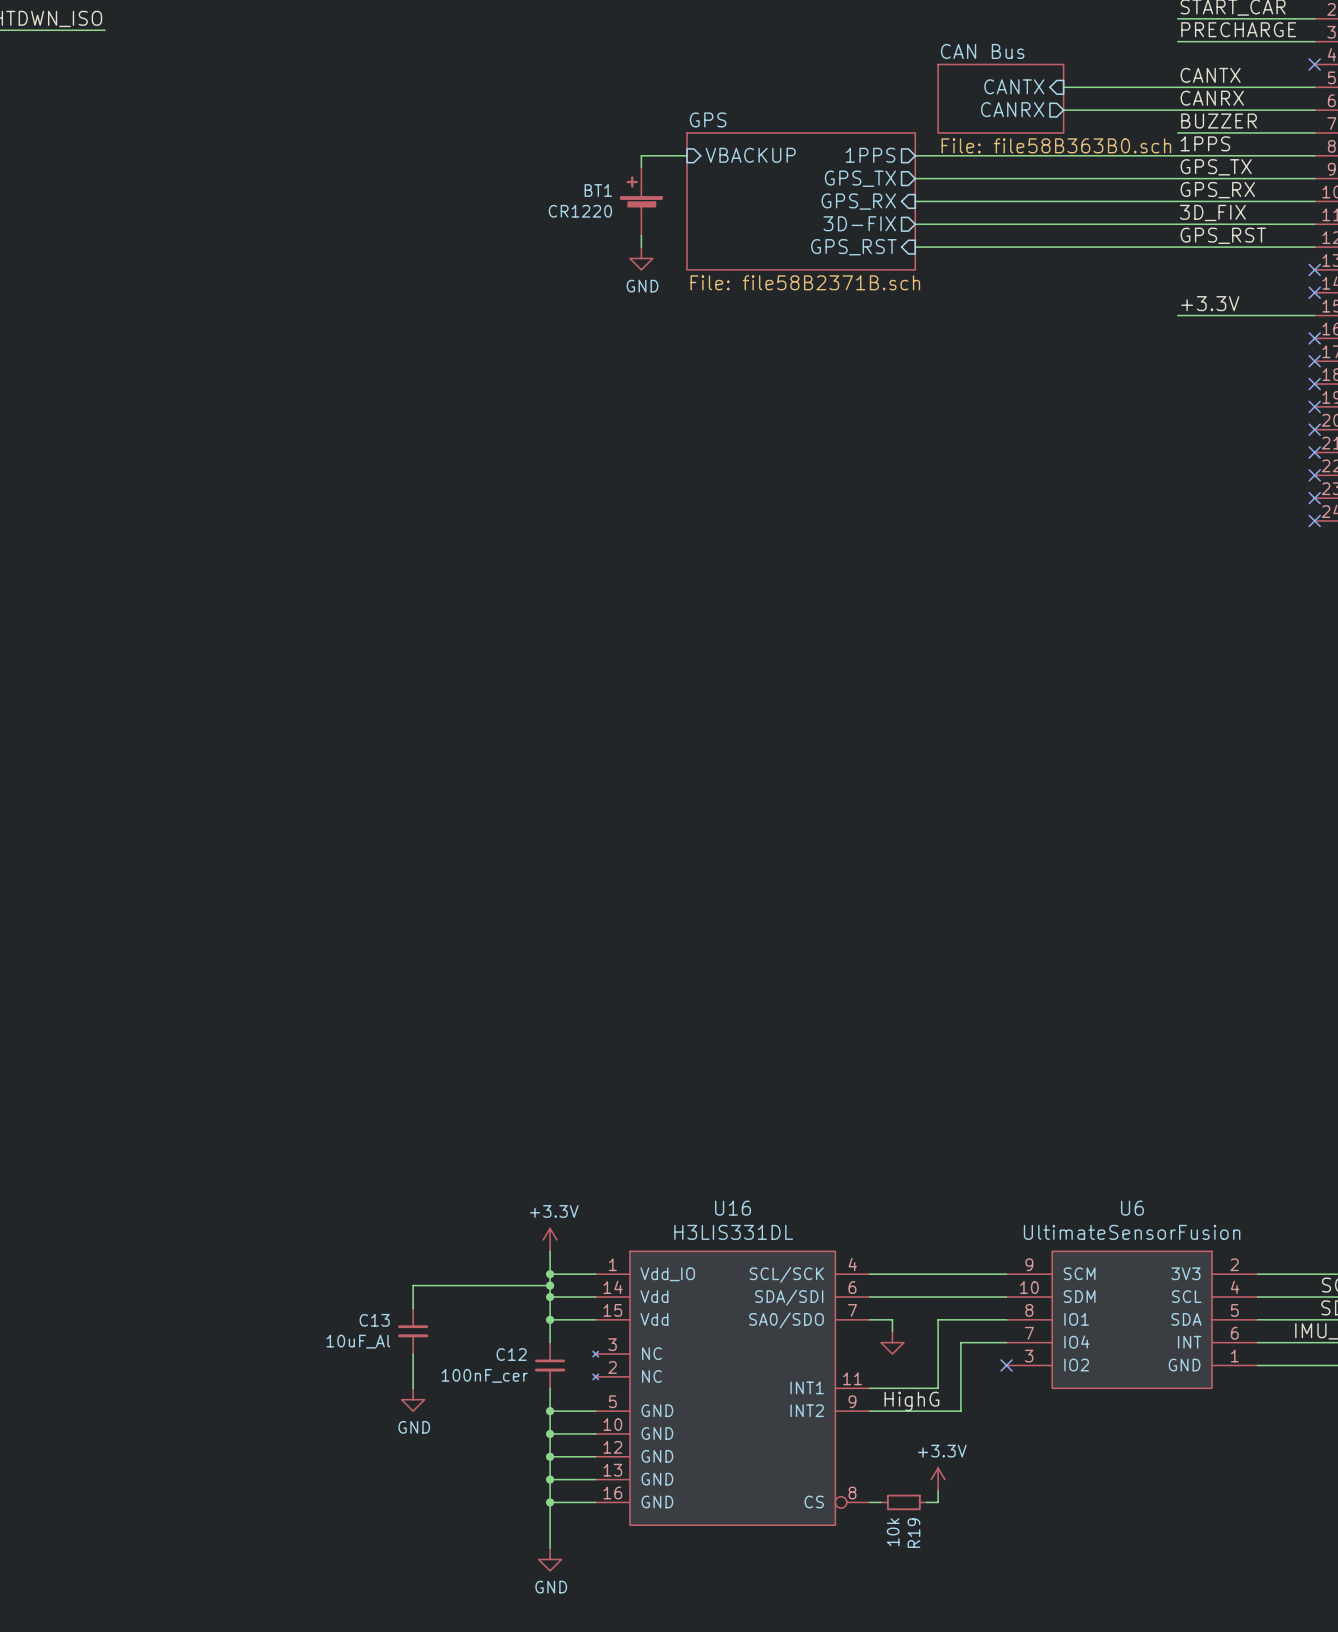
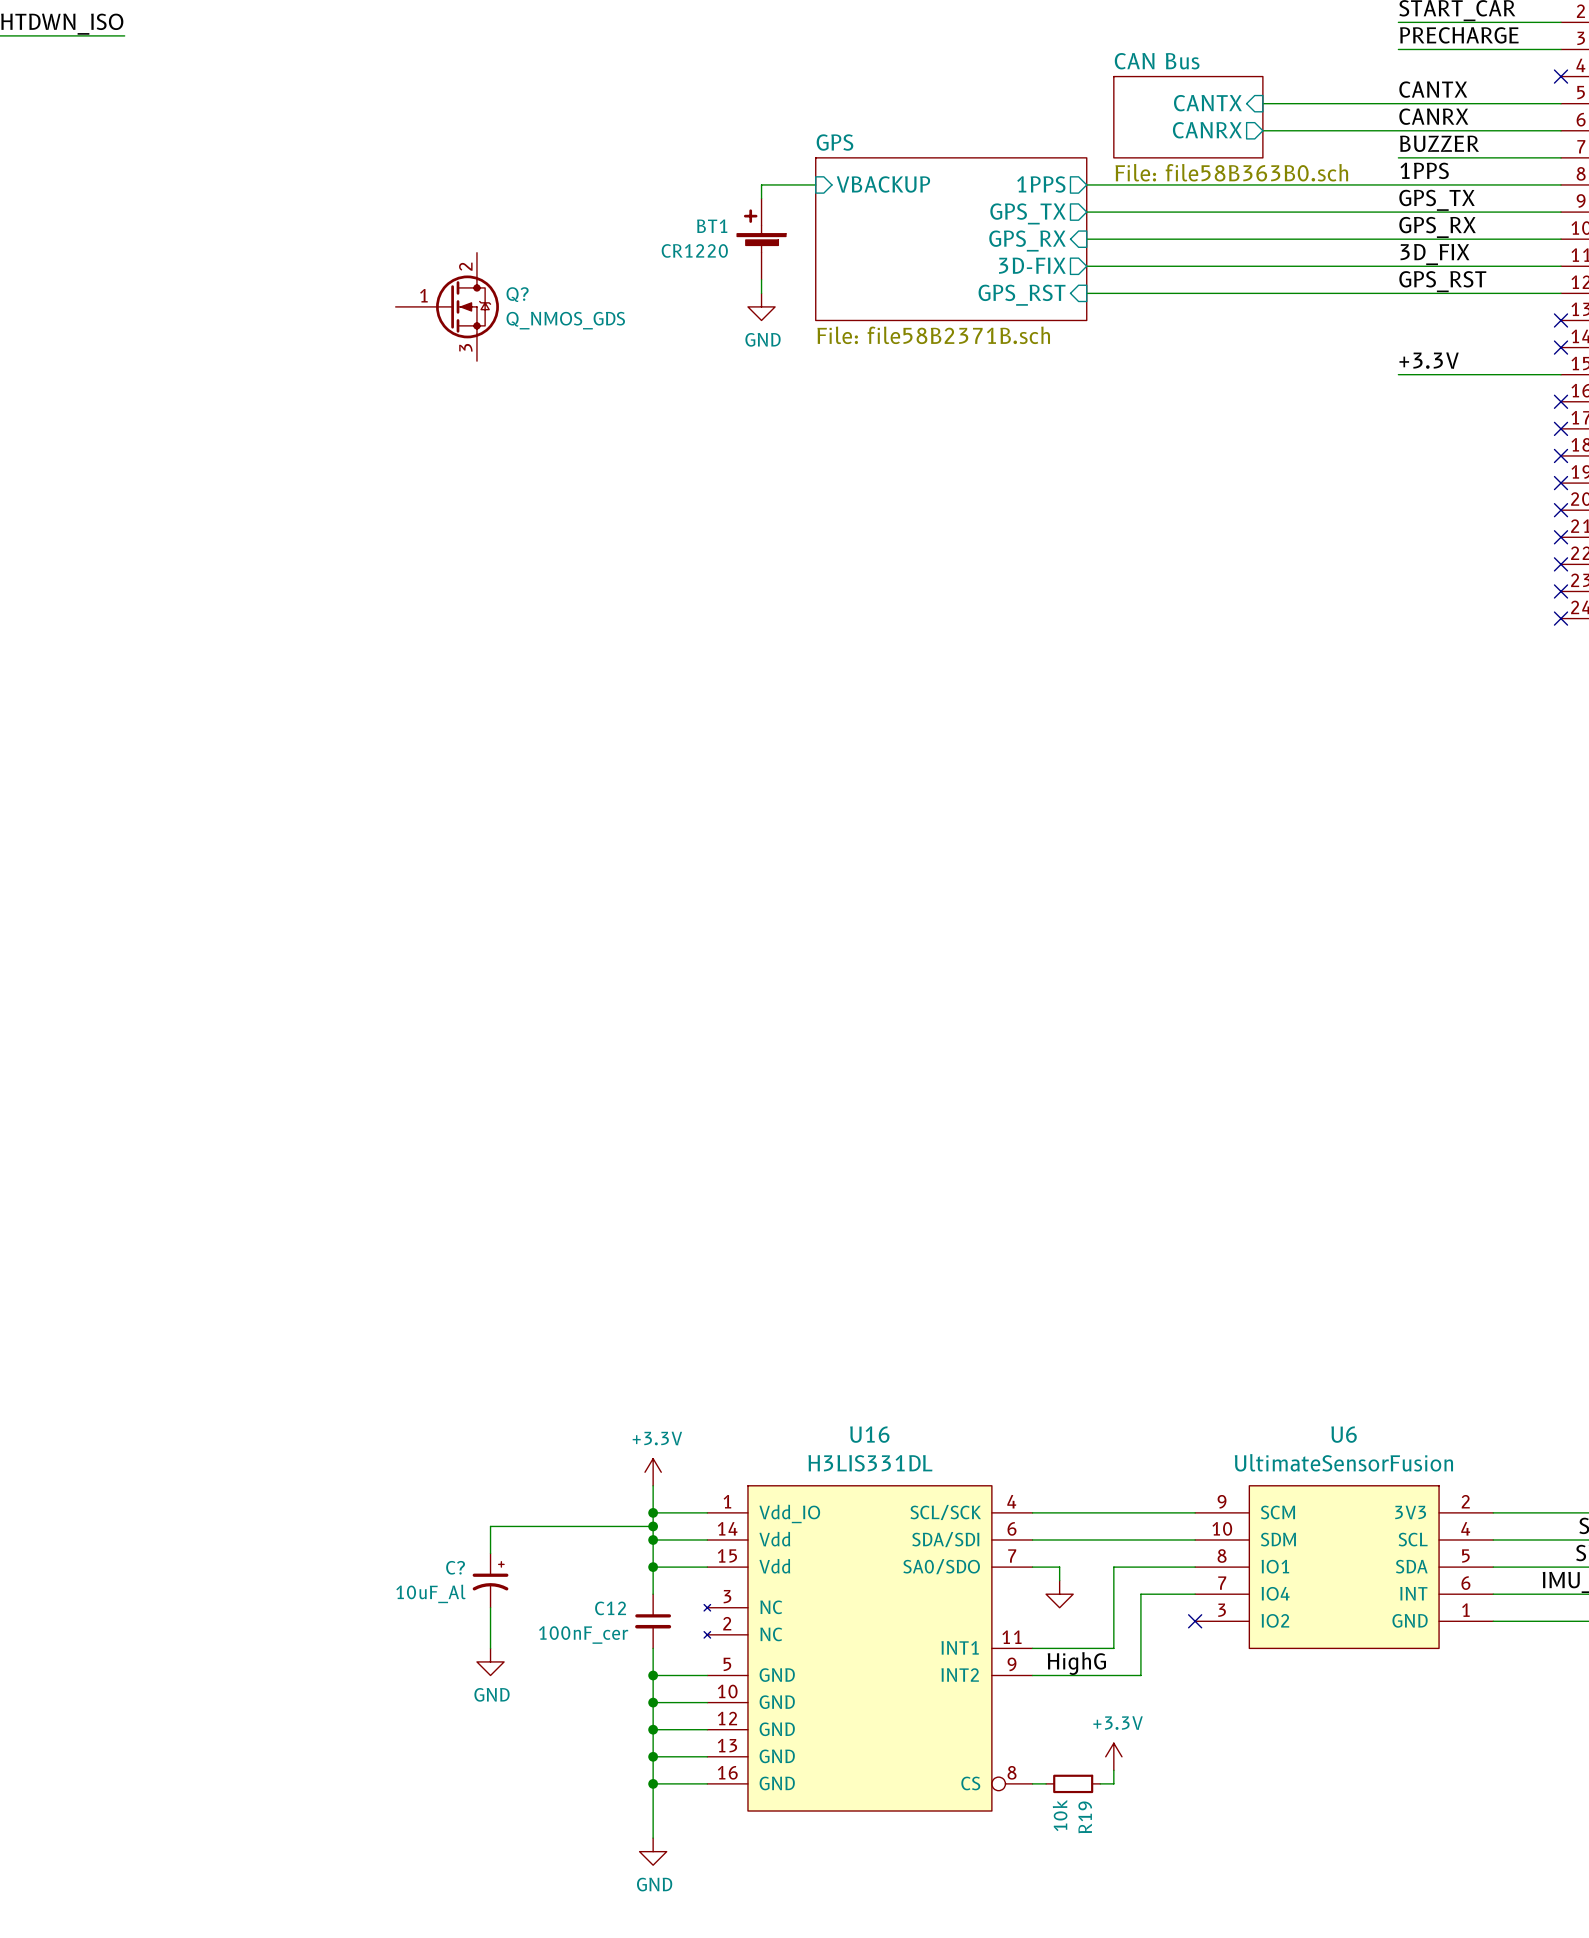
Q?: none -> Q_NMOS_GDS (447, 306)
C13: 10uF_Al (413, 1331) -> none
C?: none -> 10uF_Al (490, 1580)

